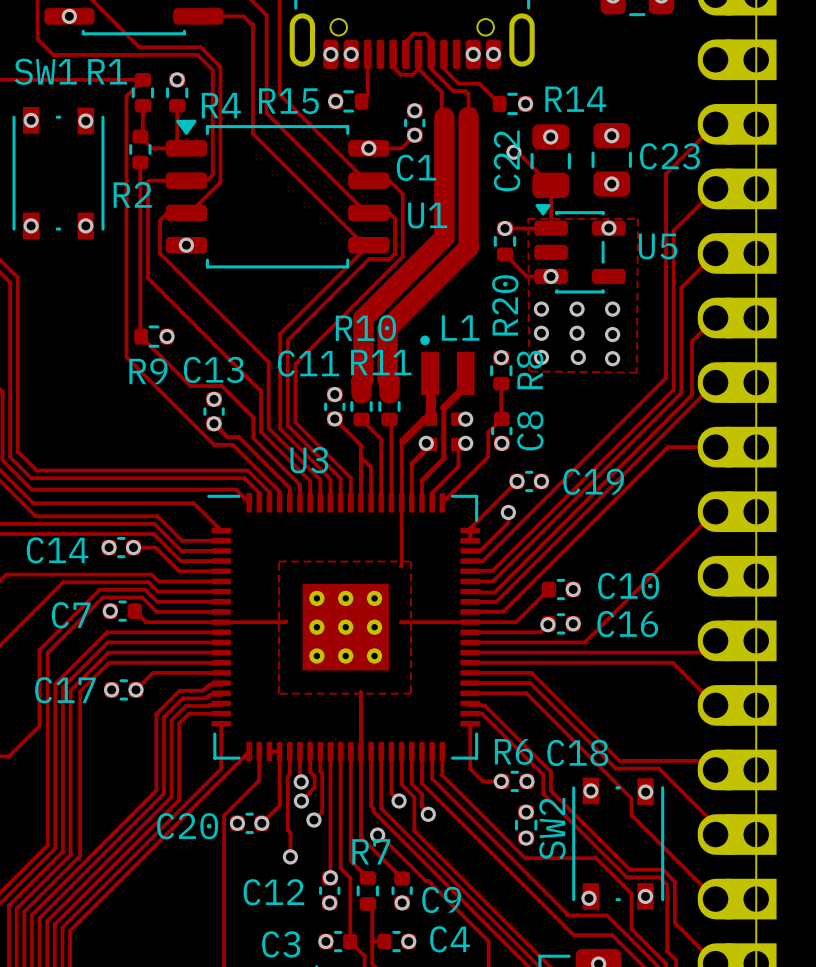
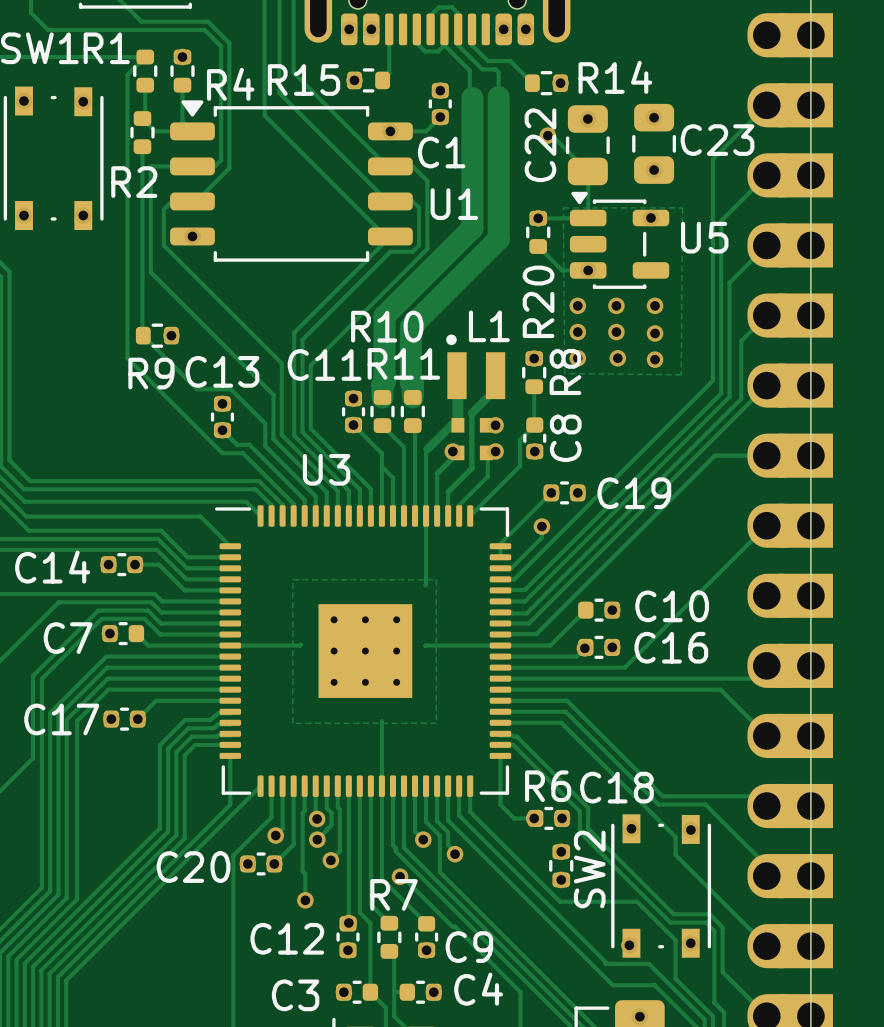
track: (269, 751) (279, 751) -> (282, 786) (282, 828) (275, 835)
via: none -> (275, 835)

